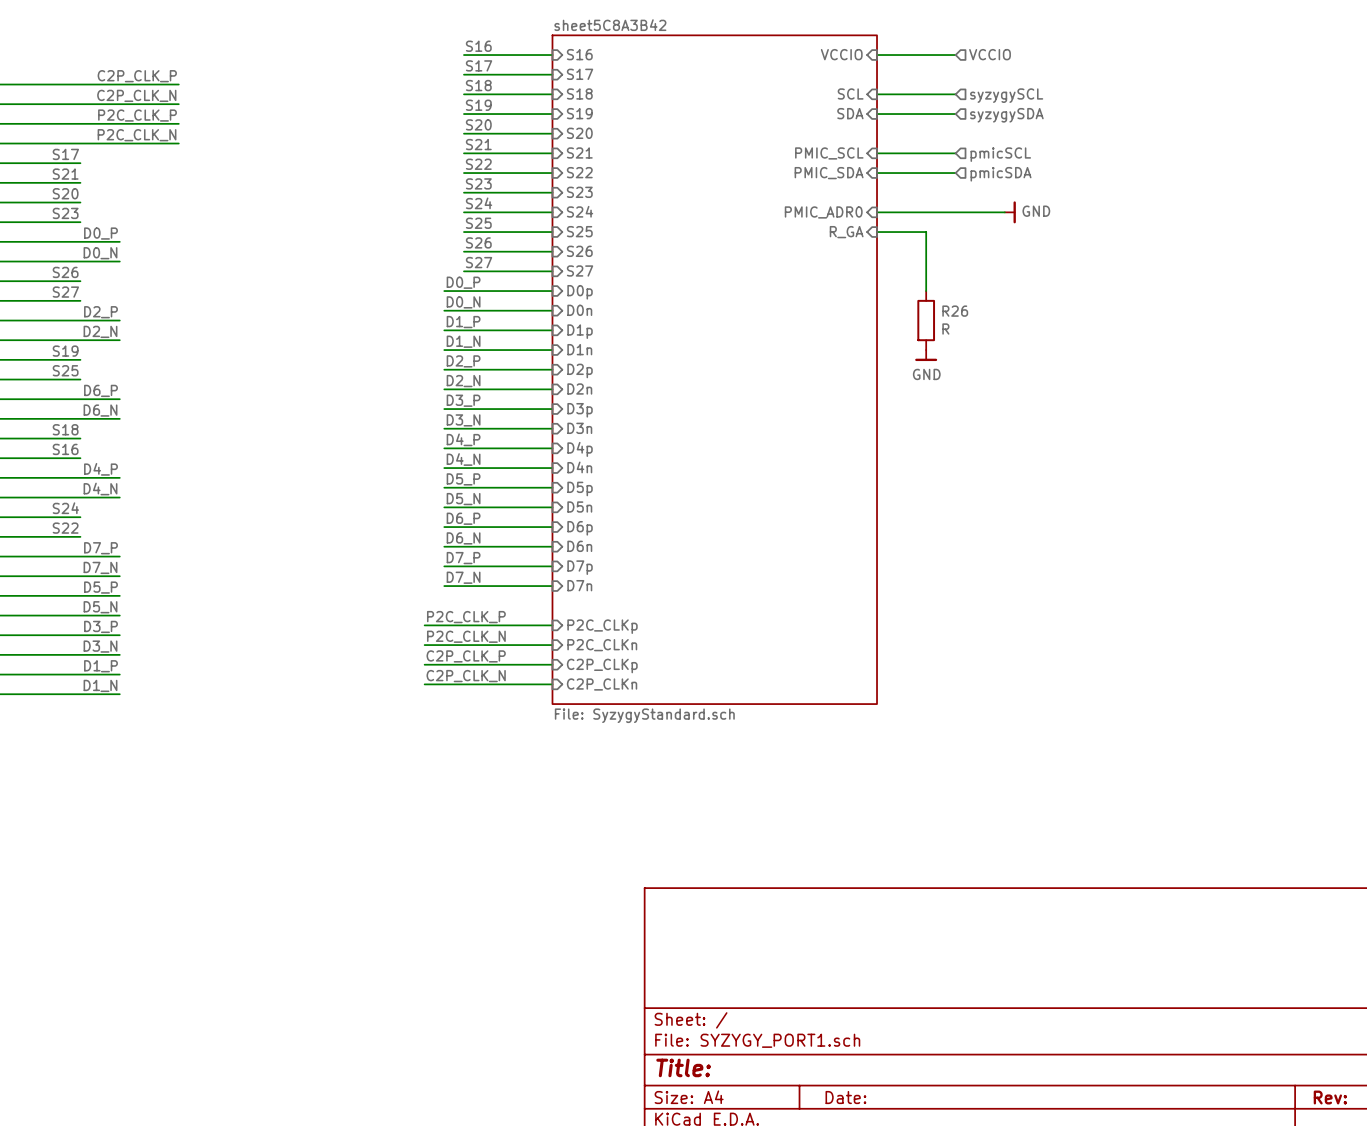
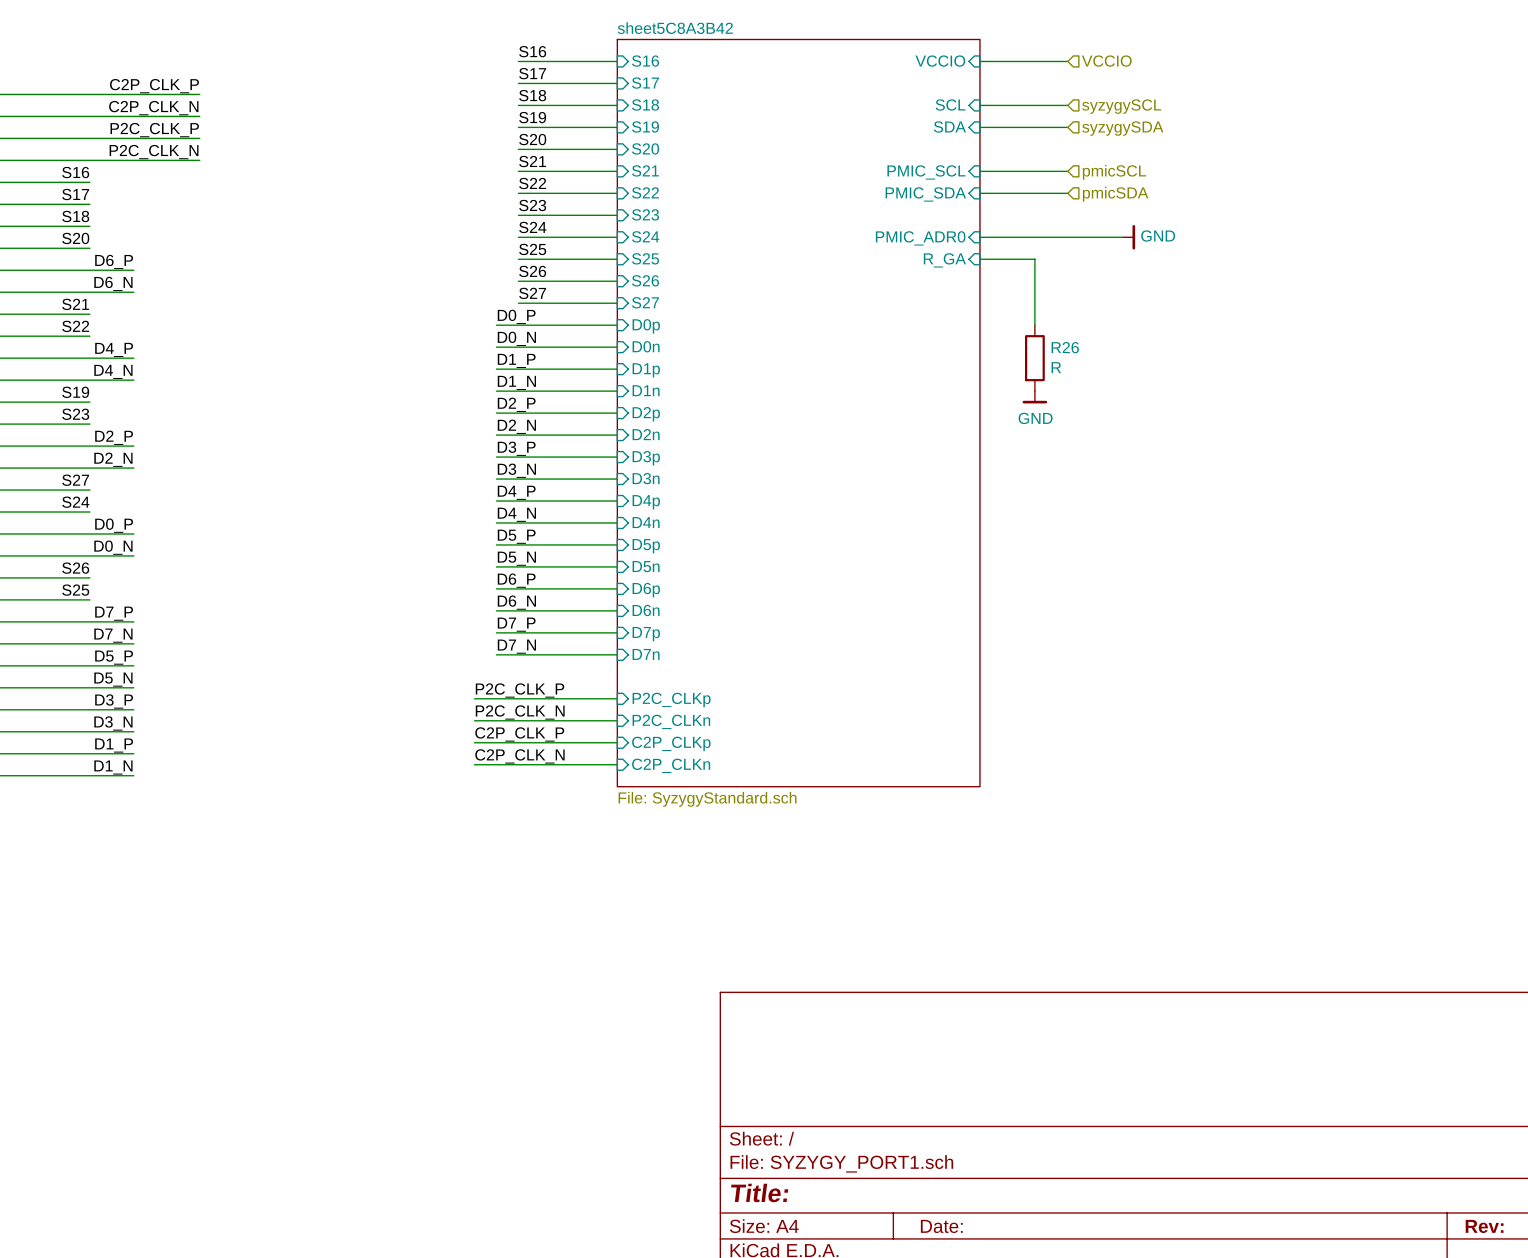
label: S17 (65, 154) -> S16 (75, 172)
label: S21 (65, 174) -> S17 (75, 194)
label: S20 (65, 193) -> S18 (75, 216)
label: S23 (65, 213) -> S20 (75, 238)
label: D0_P (100, 233) -> D6_P (114, 261)
label: D0_N (100, 253) -> D6_N (113, 283)
label: S26 (65, 272) -> S21 (75, 304)
label: S27 (65, 292) -> S22 (75, 326)
label: D2_P (100, 312) -> D4_P (114, 349)
label: D2_N (100, 331) -> D4_N (113, 371)
label: S25 (65, 370) -> S23 (75, 414)
label: D6_P (100, 390) -> D2_P (114, 437)
label: D6_N (100, 410) -> D2_N (113, 459)
label: S18 (65, 429) -> S27 (75, 480)
label: S16 (65, 449) -> S24 (75, 502)
label: D4_P (100, 469) -> D0_P (114, 525)
label: D4_N (100, 489) -> D0_N (113, 547)
label: S24 (65, 508) -> S26 (75, 568)
label: S22 (65, 528) -> S25 (75, 590)

